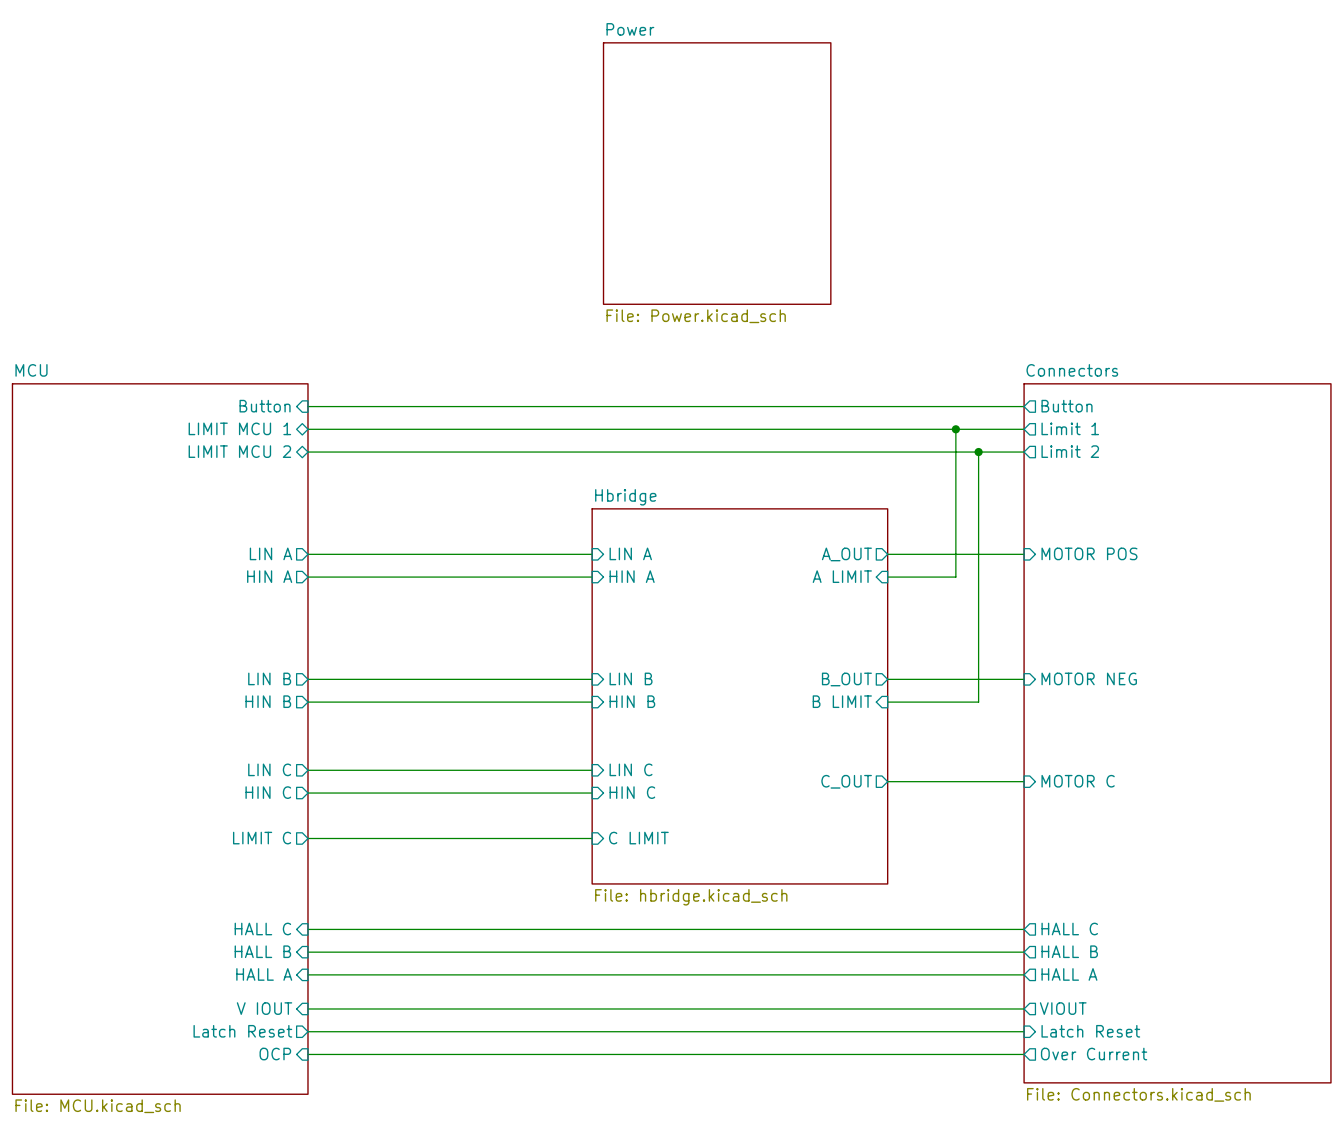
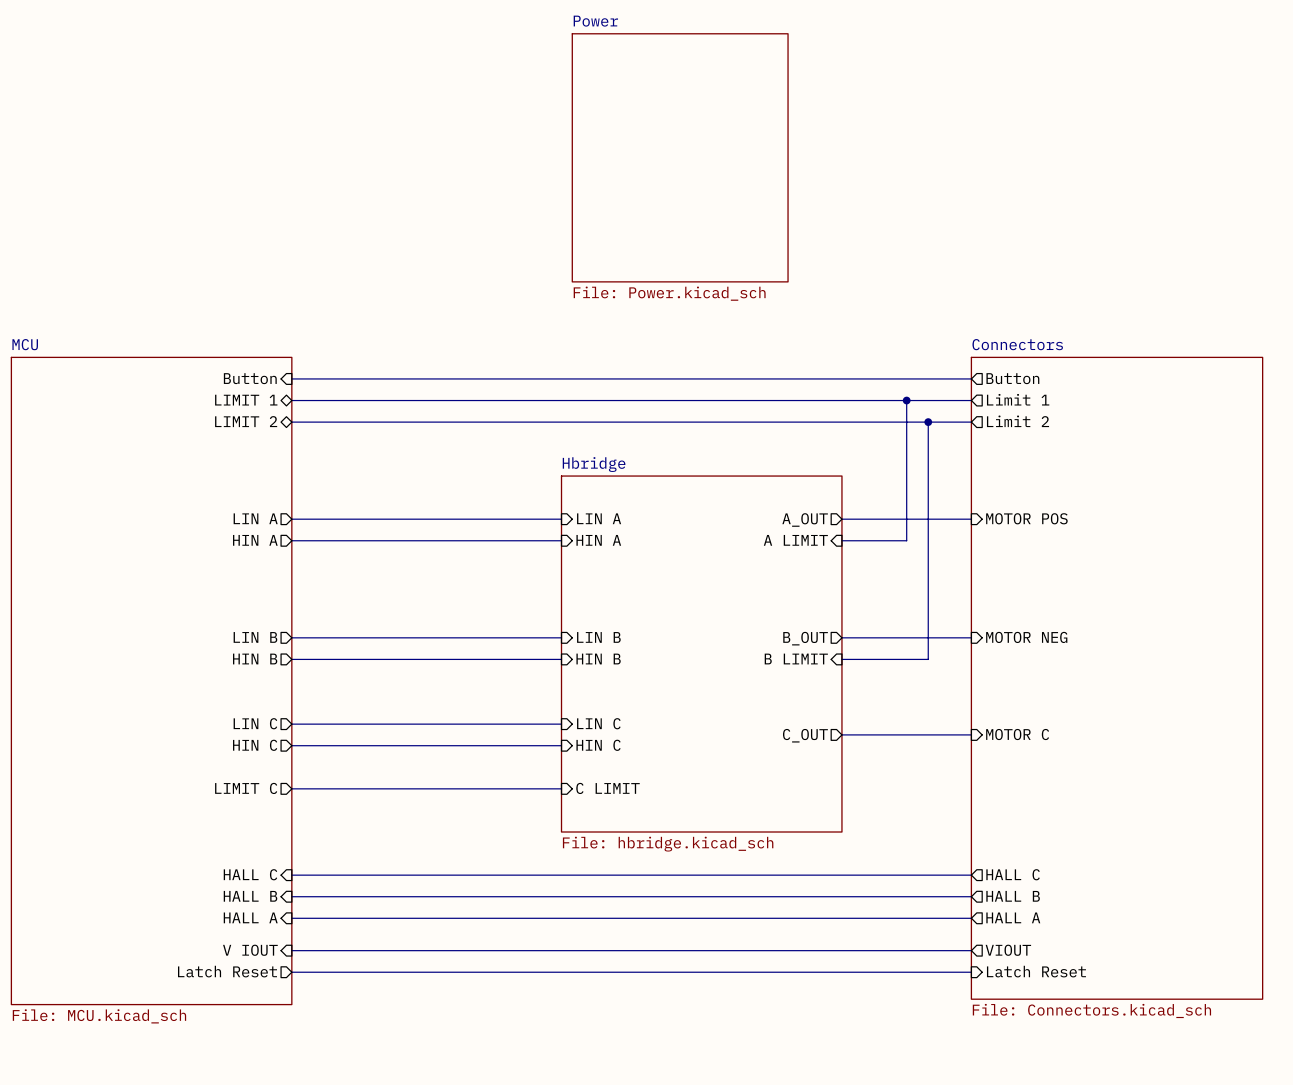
sheet pin: LIMIT MCU 1 (239, 428) -> LIMIT 1 (246, 400)
sheet pin: LIMIT MCU 2 (239, 451) -> LIMIT 2 (246, 421)
sheet Connectors: none -> File: Connectors.kicad_sch (1117, 678)
sheet MCU: none -> File: MCU.kicad_sch (151, 680)
sheet Connectors: File: Connectors.kicad_sch (1177, 733) -> none
sheet MCU: File: MCU.kicad_sch (160, 739) -> none
sheet pin: OCP (275, 1054) -> none
wire: (307, 1054) (1024, 1054) -> none
sheet pin: Over Current (1094, 1054) -> none

